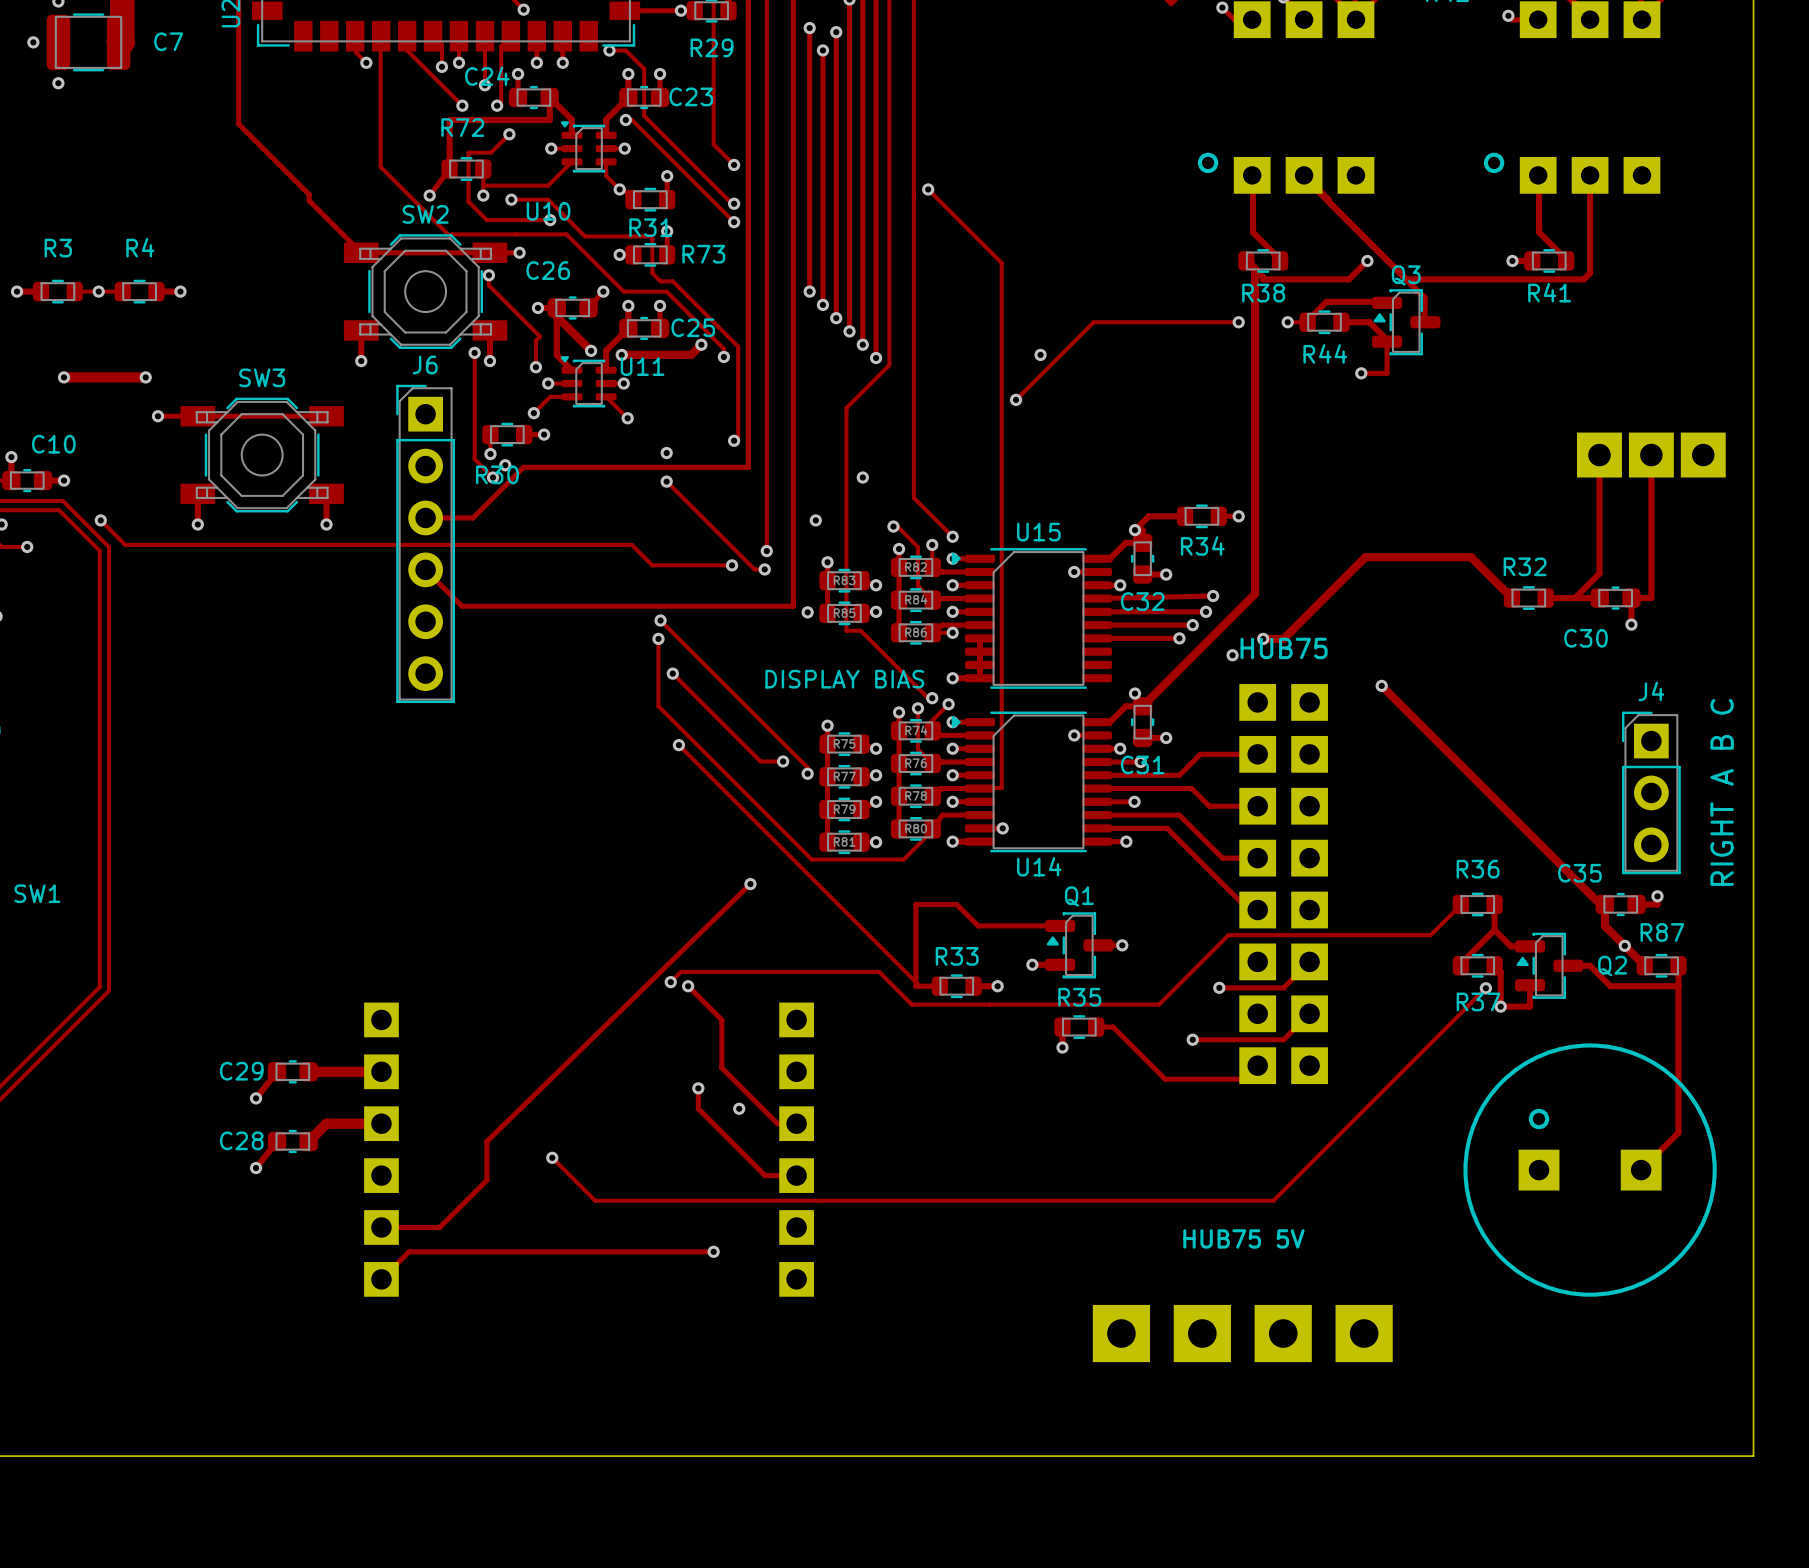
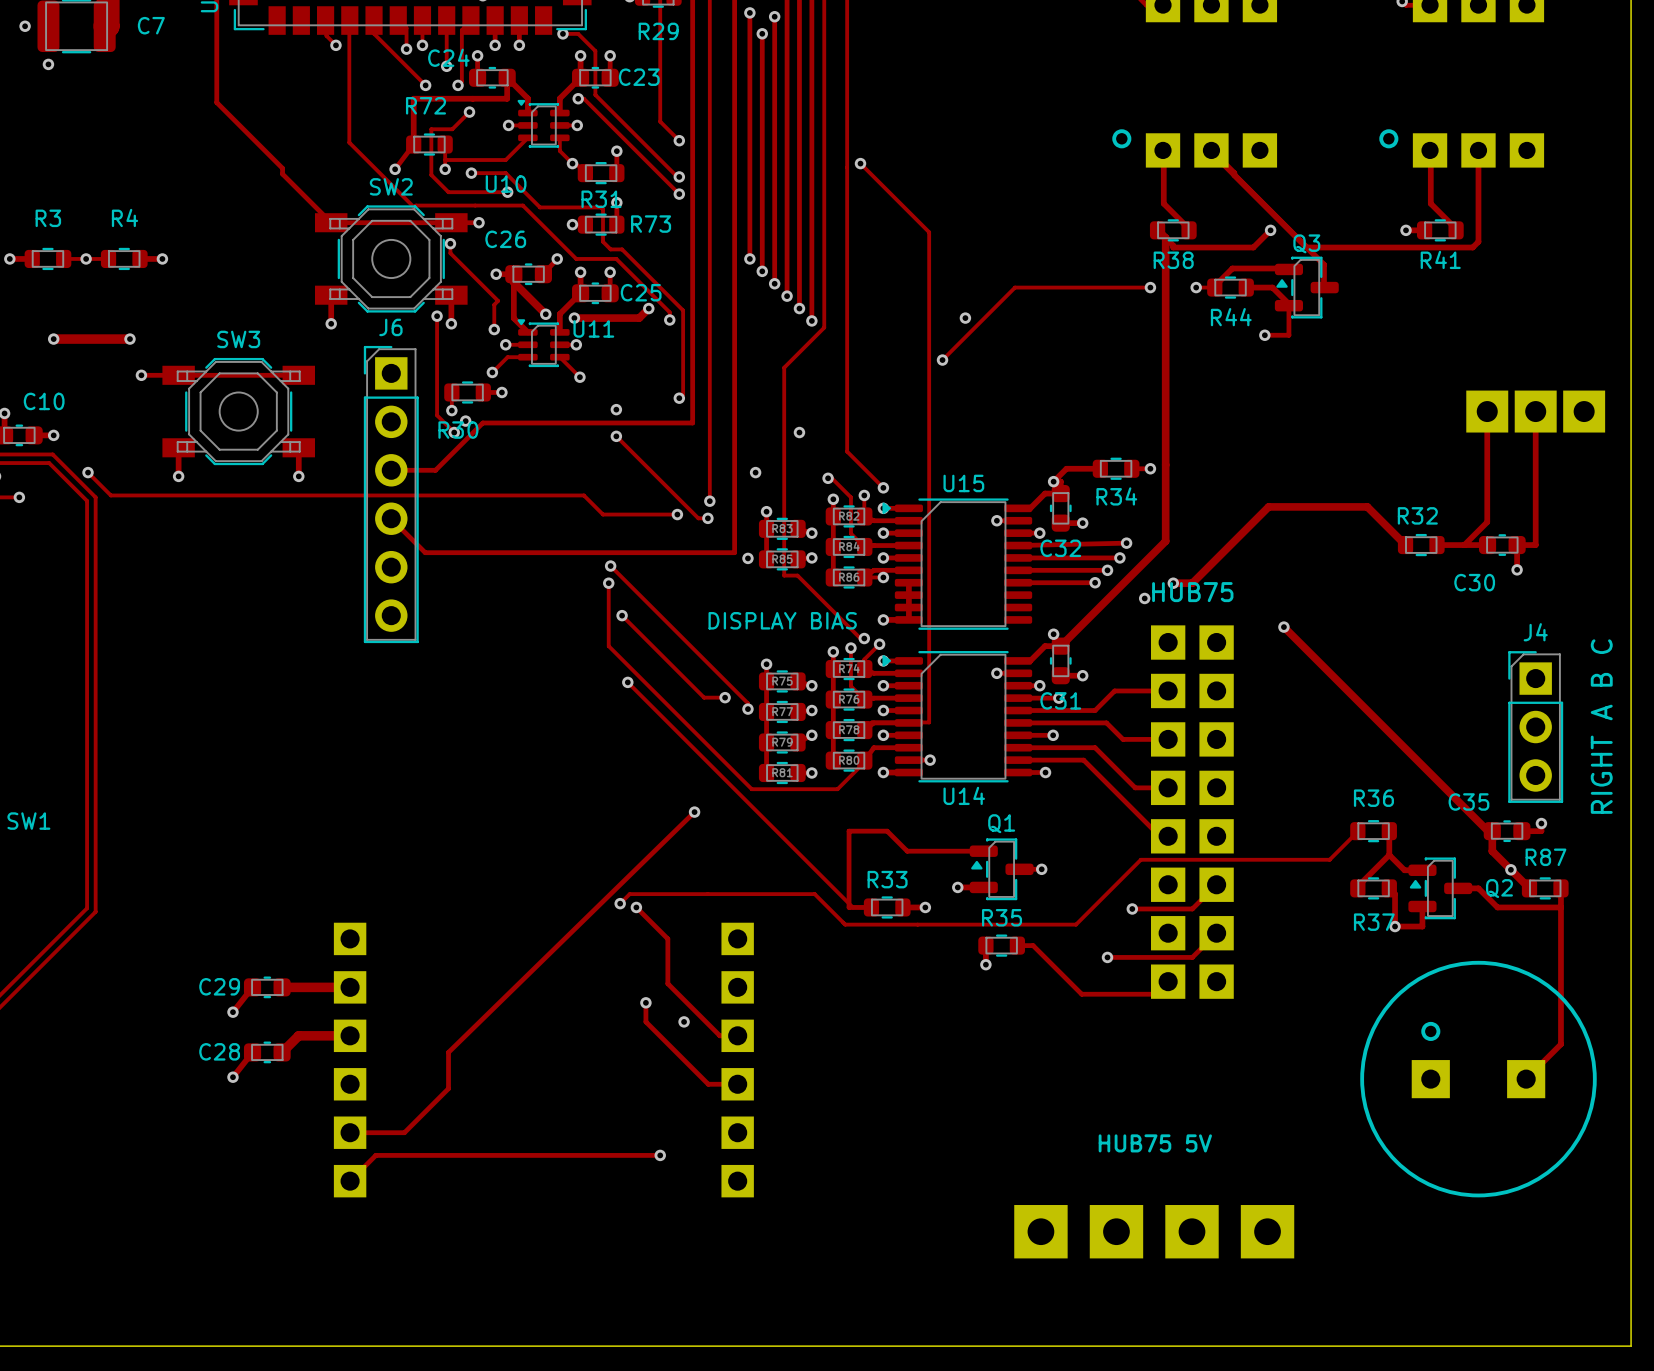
track: (1485, 988) (1273, 1200) (595, 1200) (552, 1157) -> none
via: (1485, 988) -> none
via: (552, 1157) -> none

